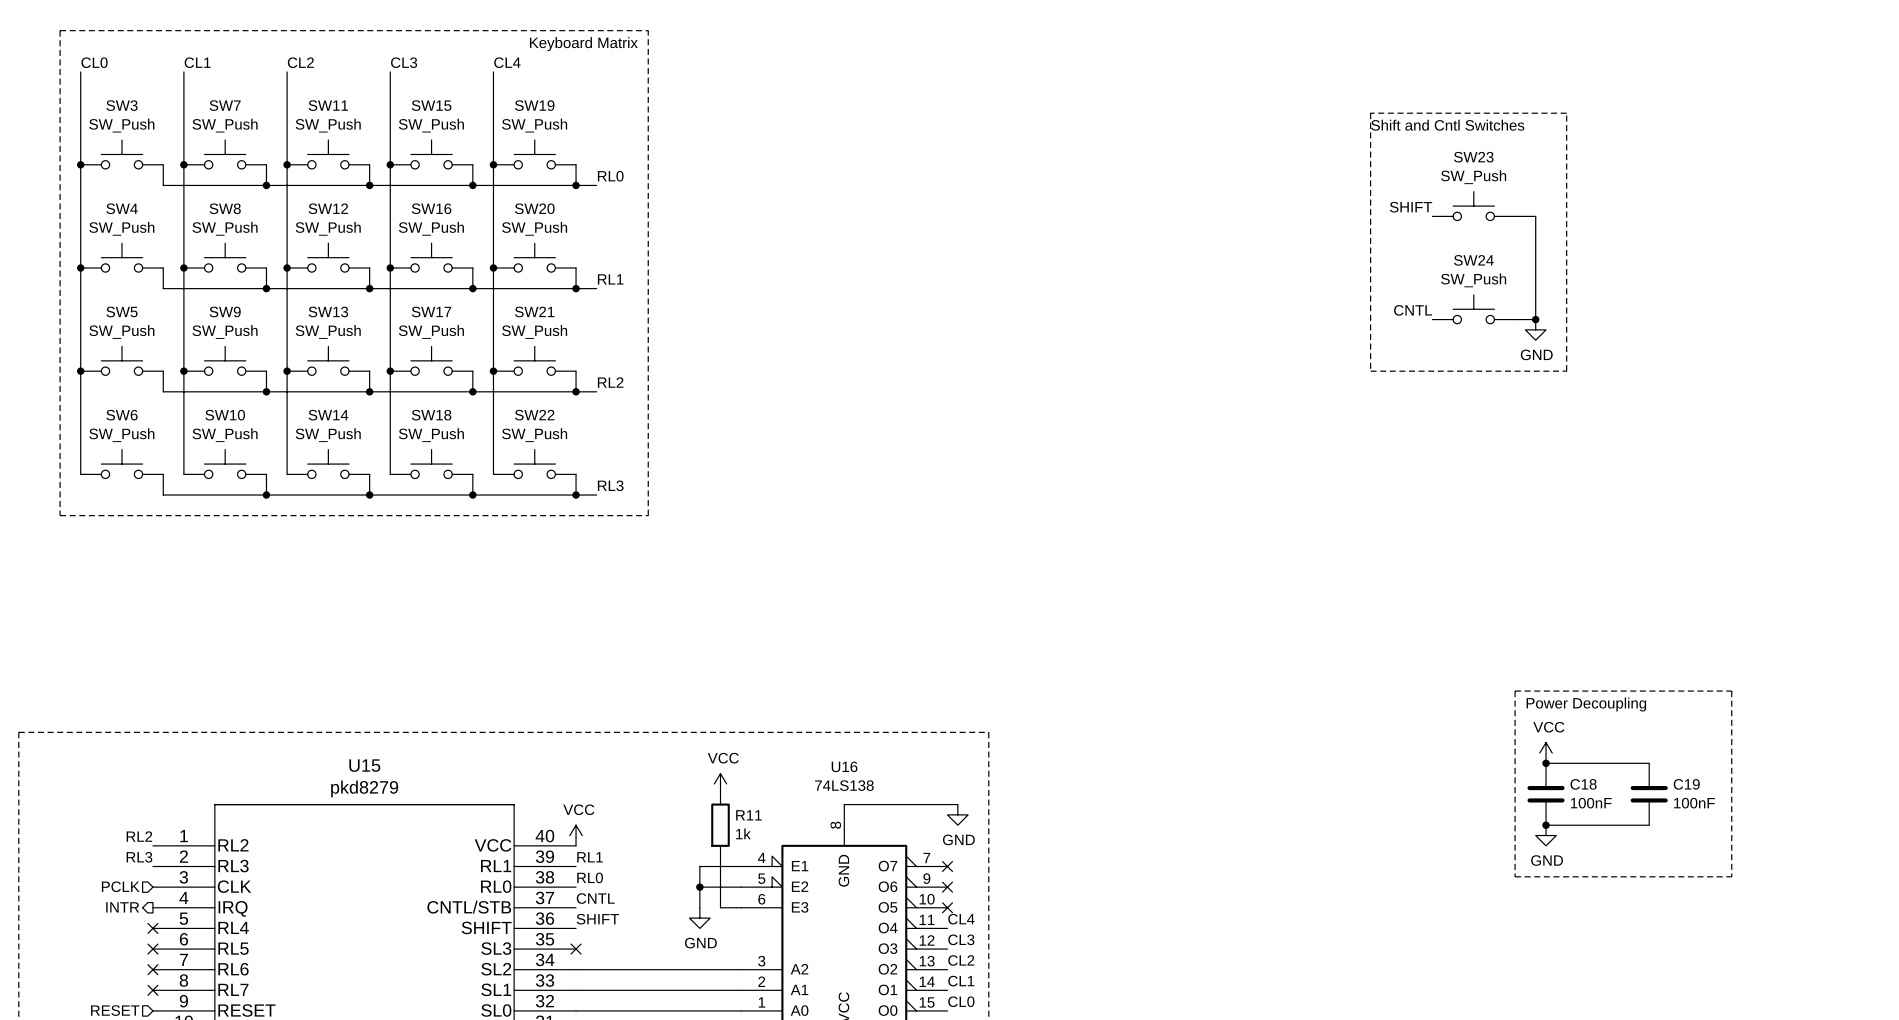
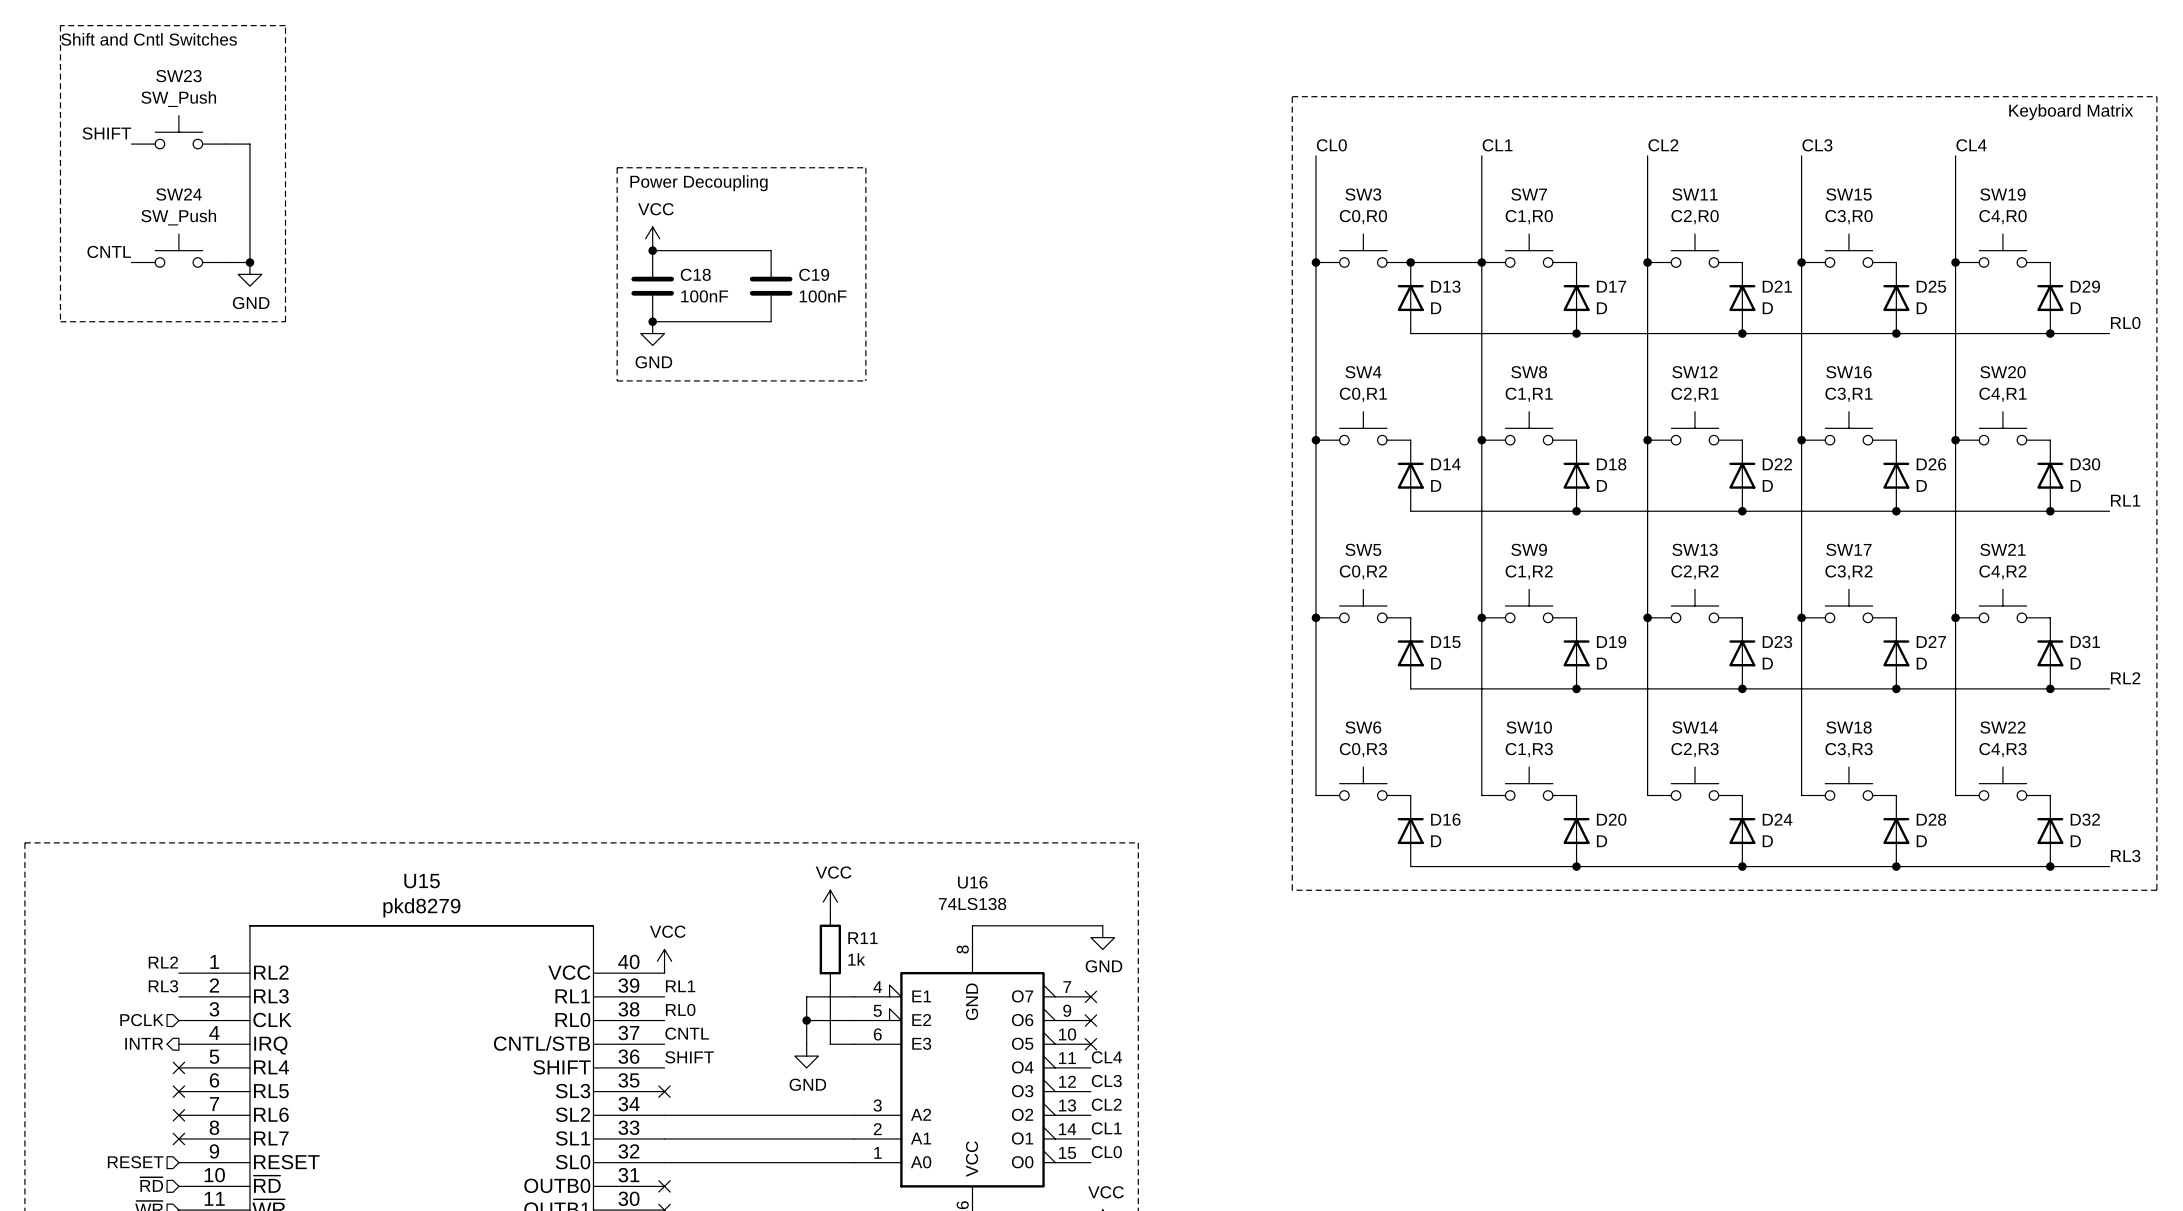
line: none -> (60, 25) (285, 25) (285, 321) (60, 321) (60, 25)
line: (60, 30) (60, 515) (648, 515) (648, 30) (60, 30) -> none
text: none -> Shift and Cntl Switches (149, 39)
text: Keyboard Matrix (583, 44) -> none
label: CL0 (94, 62) -> none
label: CL1 (197, 62) -> none
label: CL2 (300, 62) -> none
label: CL3 (404, 62) -> none
label: CL4 (507, 62) -> none
wire: (80, 71) (80, 474) -> none
wire: (183, 71) (183, 474) -> none
wire: (287, 71) (287, 474) -> none
wire: (390, 71) (390, 474) -> none
wire: (493, 71) (493, 474) -> none
line: none -> (1292, 96) (1292, 890) (2156, 890) (2156, 96) (1292, 96)
text: none -> Keyboard Matrix (2071, 112)
line: (1370, 113) (1566, 113) (1566, 371) (1370, 371) (1370, 113) -> none
label: none -> SHIFT (106, 133)
wire: none -> (226, 144) (249, 144) (249, 262) (226, 262)
label: none -> CL0 (1331, 145)
label: none -> CL1 (1497, 145)
label: none -> CL2 (1663, 145)
label: none -> CL3 (1817, 145)
label: none -> CL4 (1971, 145)
SW3 value: SW_Push (121, 125) -> C0,R0 (1363, 217)
SW7 value: SW_Push (225, 125) -> C1,R0 (1529, 217)
SW11 value: SW_Push (328, 125) -> C2,R0 (1695, 217)
SW15 value: SW_Push (431, 125) -> C3,R0 (1849, 217)
SW19 value: SW_Push (534, 125) -> C4,R0 (2003, 217)
text: Shift and Cntl Switches (1447, 125) -> none
wire: none -> (1315, 155) (1315, 795)
wire: none -> (1481, 155) (1481, 795)
wire: none -> (1647, 155) (1647, 795)
wire: none -> (1801, 155) (1801, 795)
wire: none -> (1955, 155) (1955, 795)
line: none -> (617, 167) (865, 167) (865, 380) (617, 380) (617, 167)
SW3 position: (121, 154) -> (1363, 250)
SW7 position: (225, 154) -> (1529, 250)
SW11 position: (328, 154) -> (1694, 250)
SW15 position: (431, 154) -> (1848, 250)
SW19 position: (534, 154) -> (2002, 250)
text: none -> Power Decoupling (699, 183)
junction: (80, 164) -> none
wire: (163, 164) (163, 185) (596, 185) -> none
junction: (183, 164) -> none
wire: (266, 164) (266, 185) -> none
junction: (287, 164) -> none
wire: (369, 164) (369, 185) -> none
junction: (390, 164) -> none
wire: (472, 164) (472, 185) -> none
junction: (493, 164) -> none
wire: (576, 164) (576, 185) -> none
label: RL0 (610, 176) -> none
junction: (266, 185) -> none
junction: (369, 185) -> none
junction: (472, 185) -> none
junction position: (576, 185) -> (652, 250)
power symbol: none -> VCC (652, 238)
SW23 position: (1473, 206) -> (178, 132)
label: SHIFT (1411, 207) -> none
wire: none -> (652, 250) (771, 250)
wire: (1515, 216) (1535, 216) (1535, 319) (1515, 319) -> none
label: none -> CNTL (109, 251)
junction: none -> (249, 262)
junction: none -> (1315, 262)
wire: none -> (1410, 262) (1481, 262)
junction: none -> (1410, 262)
junction: none -> (1481, 262)
junction: none -> (1647, 262)
junction: none -> (1801, 262)
junction: none -> (1955, 262)
SW4 value: SW_Push (121, 228) -> C0,R1 (1363, 394)
SW8 value: SW_Push (225, 228) -> C1,R1 (1529, 394)
SW12 value: SW_Push (328, 228) -> C2,R1 (1695, 394)
SW16 value: SW_Push (431, 228) -> C3,R1 (1848, 394)
SW20 value: SW_Push (534, 228) -> C4,R1 (2002, 394)
power symbol: none -> GND (249, 274)
SW4 position: (121, 257) -> (1363, 428)
SW8 position: (225, 257) -> (1529, 428)
SW12 position: (328, 257) -> (1694, 428)
SW16 position: (431, 257) -> (1848, 428)
SW20 position: (534, 257) -> (2002, 428)
D13: none -> D (1410, 298)
D17: none -> D (1576, 298)
D21: none -> D (1742, 298)
D25: none -> D (1896, 298)
D29: none -> D (2050, 298)
junction: (80, 267) -> none
wire: (163, 267) (163, 288) (596, 288) -> none
junction: (183, 267) -> none
wire: (266, 267) (266, 288) -> none
junction: (287, 267) -> none
wire: (369, 267) (369, 288) -> none
junction: (390, 267) -> none
wire: (472, 267) (472, 288) -> none
junction: (493, 267) -> none
wire: (576, 267) (576, 288) -> none
wire: none -> (652, 321) (771, 321)
label: RL1 (610, 279) -> none
label: none -> RL0 (2125, 323)
junction: (266, 288) -> none
junction: (369, 288) -> none
junction: (472, 288) -> none
power symbol: none -> GND (652, 333)
junction position: (576, 288) -> (652, 321)
wire: none -> (1410, 333) (2109, 333)
junction: none -> (1576, 333)
junction: none -> (1742, 333)
junction: none -> (1896, 333)
junction: none -> (2050, 333)
SW24 position: (1473, 309) -> (178, 250)
label: CNTL (1413, 310) -> none
junction: (1535, 319) -> none
power symbol: GND (1535, 329) -> none
SW5 value: SW_Push (121, 331) -> C0,R2 (1363, 572)
SW9 value: SW_Push (225, 331) -> C1,R2 (1529, 572)
SW13 value: SW_Push (328, 331) -> C2,R2 (1694, 572)
SW17 value: SW_Push (431, 331) -> C3,R2 (1848, 572)
SW21 value: SW_Push (534, 331) -> C4,R2 (2002, 572)
SW5 position: (121, 360) -> (1363, 605)
SW9 position: (225, 360) -> (1529, 605)
SW13 position: (328, 360) -> (1694, 605)
SW17 position: (431, 360) -> (1848, 605)
SW21 position: (534, 360) -> (2002, 605)
junction: (80, 371) -> none
wire: (163, 371) (163, 391) (596, 391) -> none
junction: (183, 371) -> none
wire: (266, 371) (266, 391) -> none
junction: (287, 371) -> none
wire: (369, 371) (369, 391) -> none
junction: (390, 371) -> none
wire: (472, 371) (472, 391) -> none
junction: (493, 371) -> none
wire: (576, 371) (576, 391) -> none
junction: none -> (1315, 440)
junction: none -> (1481, 440)
junction: none -> (1647, 440)
junction: none -> (1801, 440)
junction: none -> (1955, 440)
label: RL2 (610, 382) -> none
junction: (266, 391) -> none
junction: (369, 391) -> none
junction: (472, 391) -> none
junction: (576, 391) -> none
D14: none -> D (1410, 475)
D18: none -> D (1576, 475)
D22: none -> D (1742, 475)
D26: none -> D (1896, 475)
D30: none -> D (2050, 475)
label: none -> RL1 (2125, 500)
SW6 value: SW_Push (121, 435) -> C0,R3 (1363, 750)
SW10 value: SW_Push (225, 435) -> C1,R3 (1529, 750)
SW14 value: SW_Push (328, 435) -> C2,R3 (1695, 750)
SW18 value: SW_Push (431, 435) -> C3,R3 (1849, 750)
SW22 value: SW_Push (534, 435) -> C4,R3 (2003, 750)
wire: none -> (1410, 511) (2109, 511)
junction: none -> (1576, 511)
junction: none -> (1742, 511)
junction: none -> (1896, 511)
junction: none -> (2050, 511)
SW6 position: (121, 464) -> (1363, 783)
SW10 position: (225, 464) -> (1529, 783)
SW14 position: (328, 464) -> (1694, 783)
SW18 position: (431, 464) -> (1848, 783)
SW22 position: (534, 464) -> (2002, 783)
wire: (163, 474) (163, 495) (596, 495) -> none
wire: (266, 474) (266, 495) -> none
wire: (369, 474) (369, 495) -> none
wire: (472, 474) (472, 495) -> none
wire: (576, 474) (576, 495) -> none
label: RL3 (610, 485) -> none
junction: (266, 495) -> none
junction: (369, 495) -> none
junction: (472, 495) -> none
junction: (576, 495) -> none
junction: none -> (1315, 617)
junction: none -> (1481, 617)
junction: none -> (1647, 617)
junction: none -> (1801, 617)
junction: none -> (1955, 617)
D15: none -> D (1410, 653)
D19: none -> D (1576, 653)
D23: none -> D (1742, 653)
D27: none -> D (1896, 653)
D31: none -> D (2050, 653)
label: none -> RL2 (2125, 678)
wire: none -> (1410, 688) (2109, 688)
junction: none -> (1576, 688)
junction: none -> (1742, 688)
junction: none -> (1896, 688)
junction: none -> (2050, 688)
line: (1515, 691) (1731, 691) (1731, 876) (1515, 876) (1515, 691) -> none
text: Power Decoupling (1586, 704) -> none
D16: none -> D (1410, 831)
D20: none -> D (1576, 831)
D24: none -> D (1742, 831)
D28: none -> D (1896, 831)
D32: none -> D (2050, 831)
label: none -> RL3 (2125, 855)
wire: none -> (1410, 866) (2109, 866)
junction: none -> (1576, 866)
power symbol: VCC (1546, 752) -> none
junction: none -> (1896, 866)
junction: none -> (2050, 866)
wire: (1546, 763) (1649, 763) -> none
junction position: (1546, 763) -> (1742, 866)
C18 position: (1546, 794) -> (652, 286)
C19 position: (1649, 794) -> (771, 286)
wire: (1546, 825) (1649, 825) -> none
junction: (1546, 825) -> none
power symbol: GND (1546, 835) -> none

